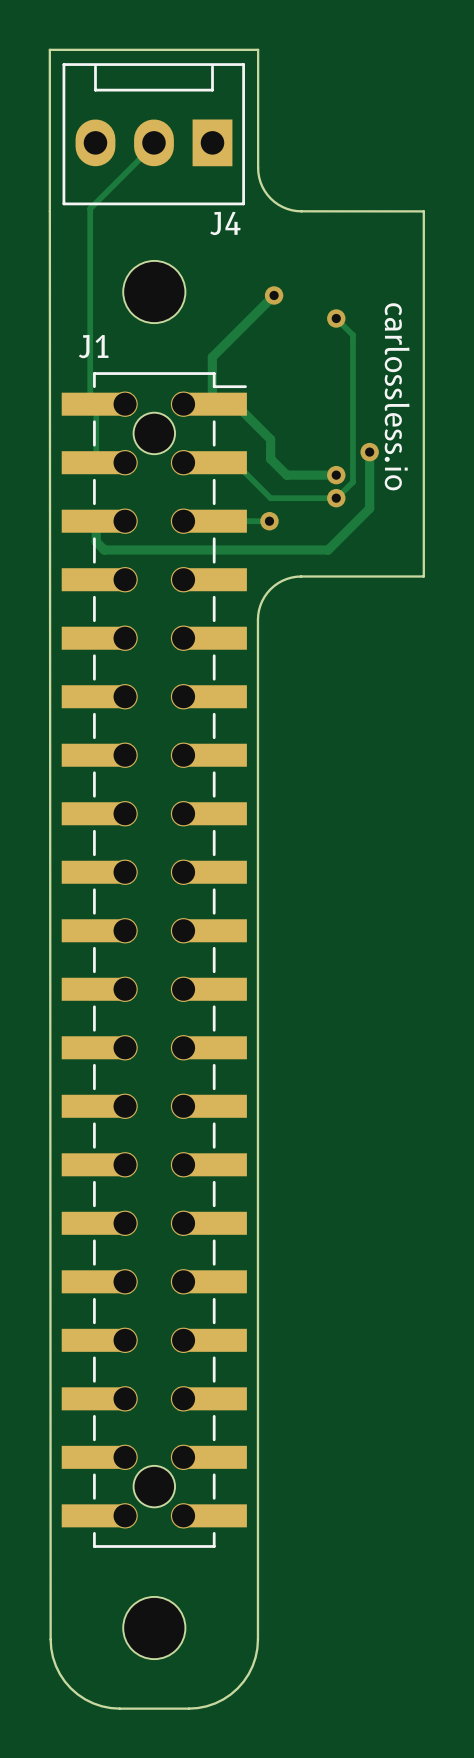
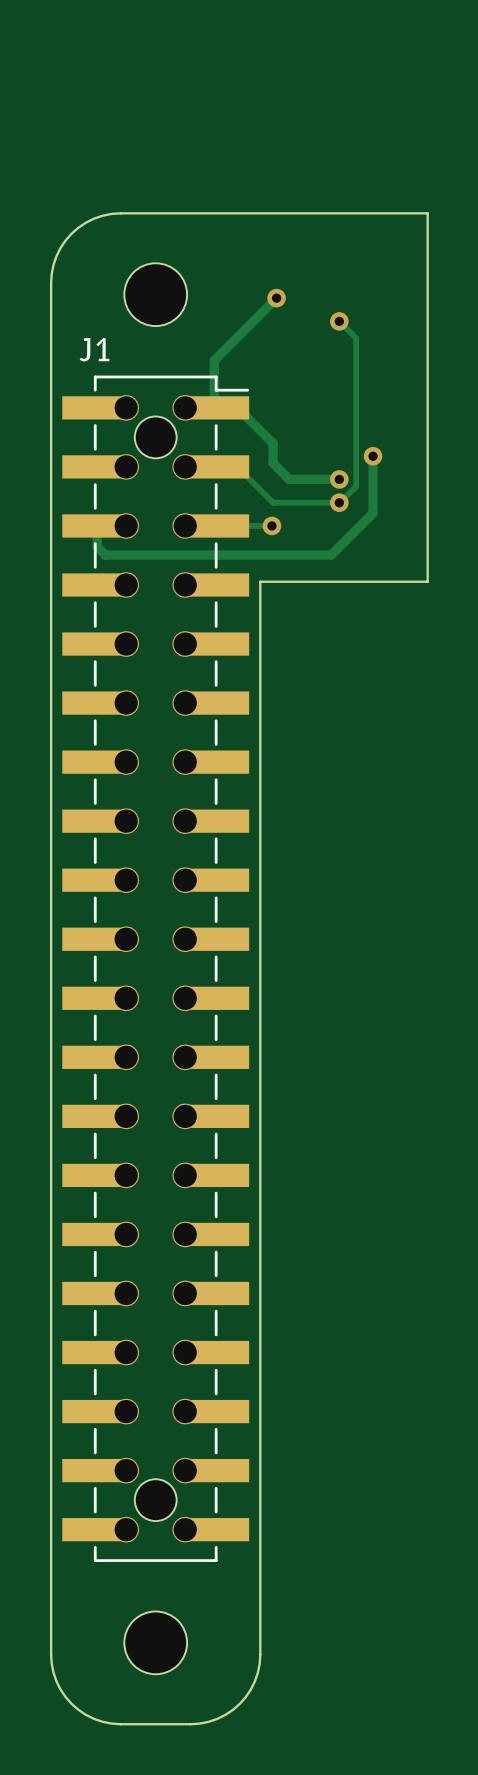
J4: (153, 134) -> none
track: (154, 144) (90, 208) (90, 398) (96, 404) (96, 462) -> none
board edge: (423, 211) (296, 211) (282, 207) (270, 198) (262, 186) (258, 172) (258, 49) (49, 49) (50, 1639) -> (427, 213) (111, 213) (94, 218) (71, 233) (60, 248) (53, 265) (51, 283) (51, 1654)
text: carlossless.io (397, 396) -> none
board edge: (301, 576) (286, 578) (270, 589) (262, 601) (257, 619) -> (304, 581) (260, 581) (260, 625)

